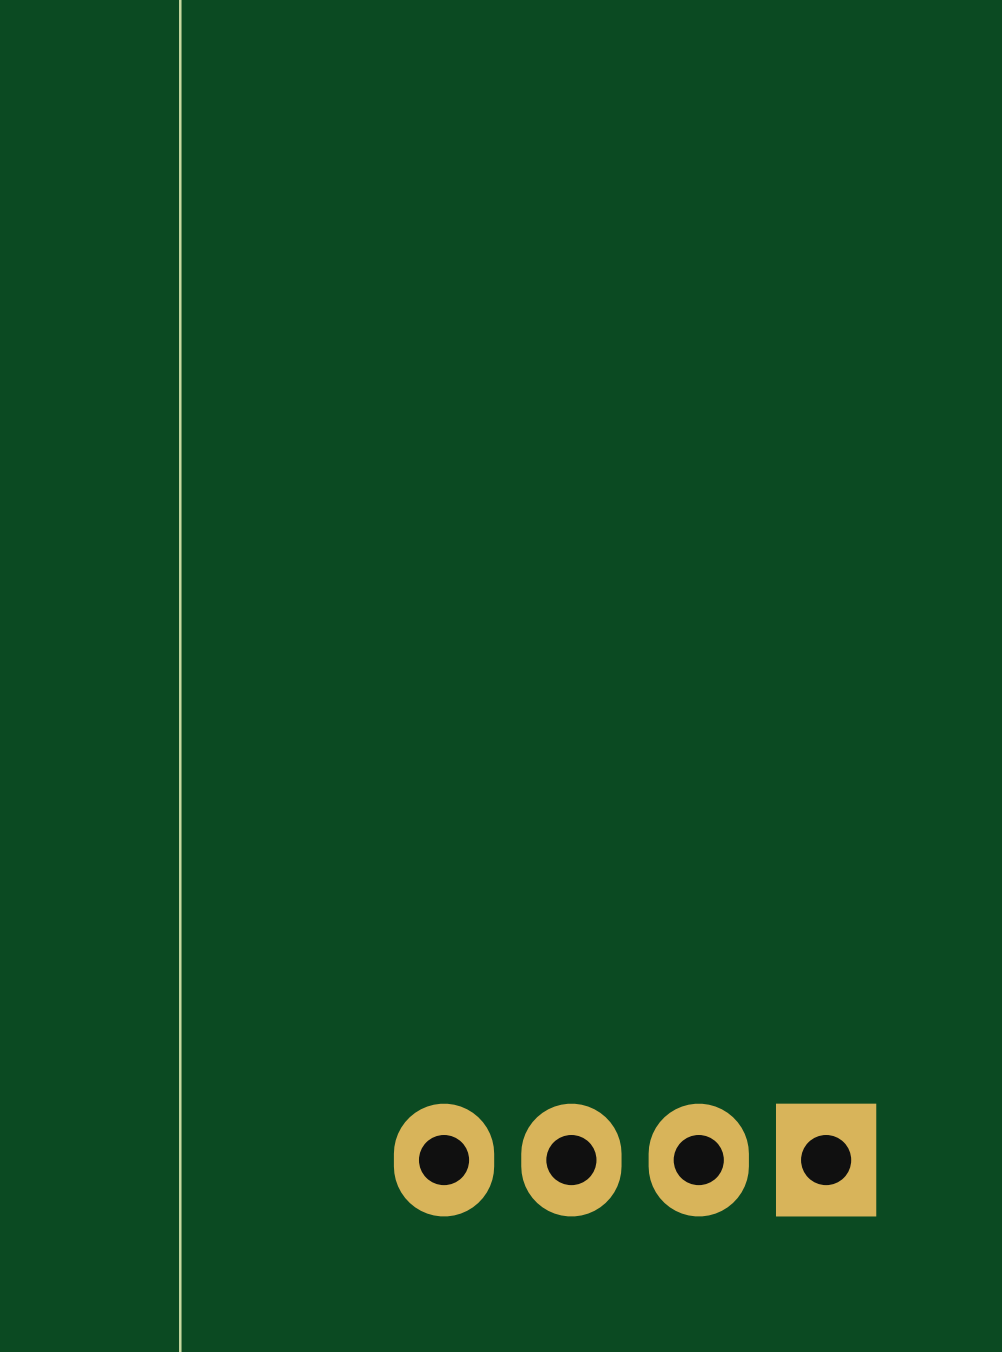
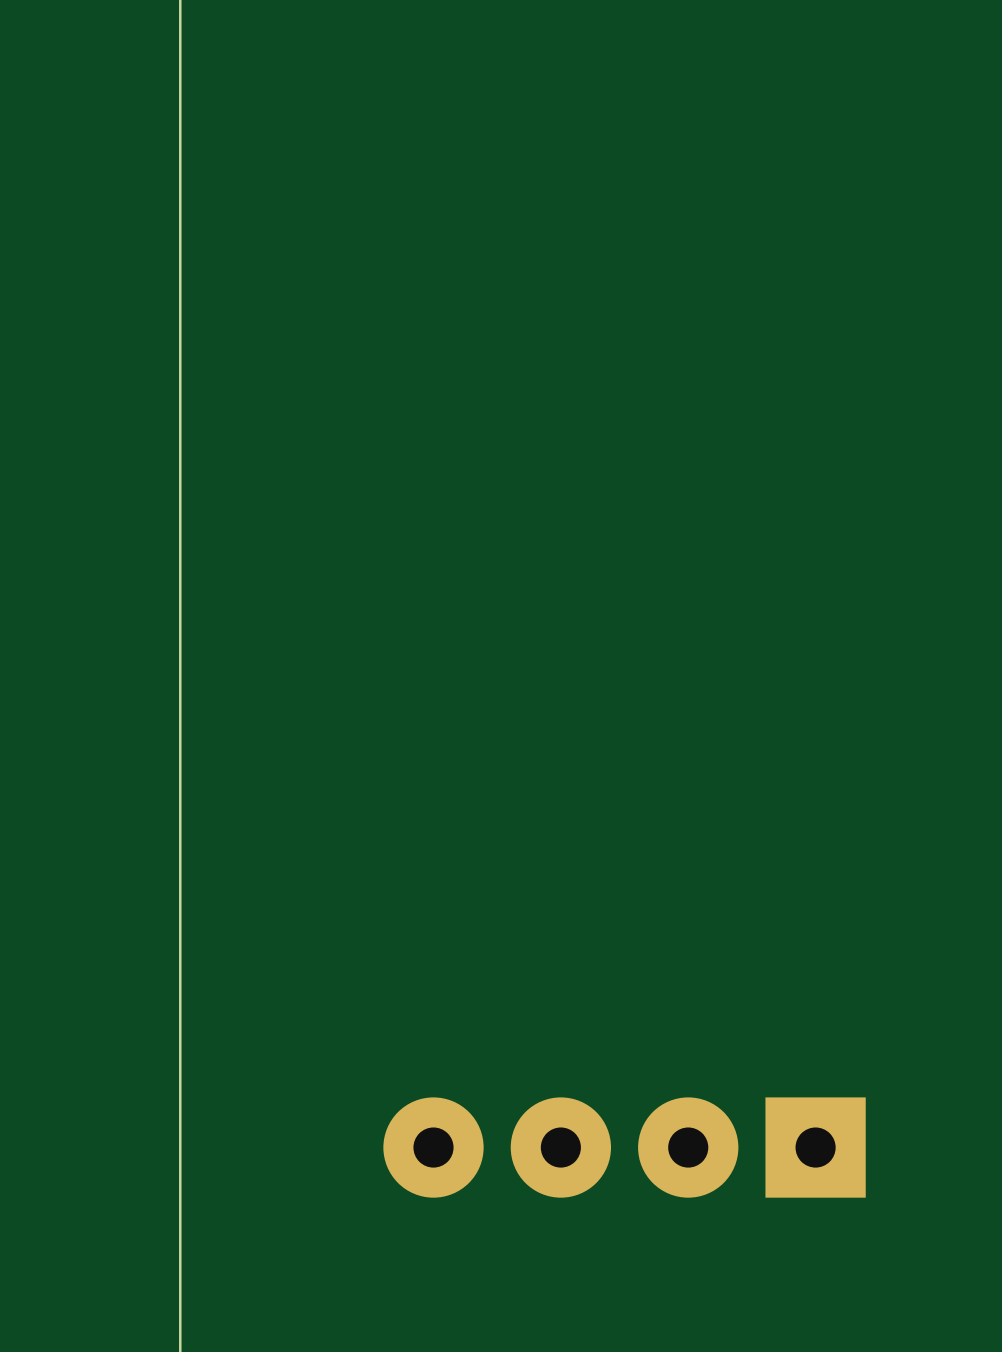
part footprint: [393, 1103, 877, 1217] -> [383, 1097, 866, 1198]

